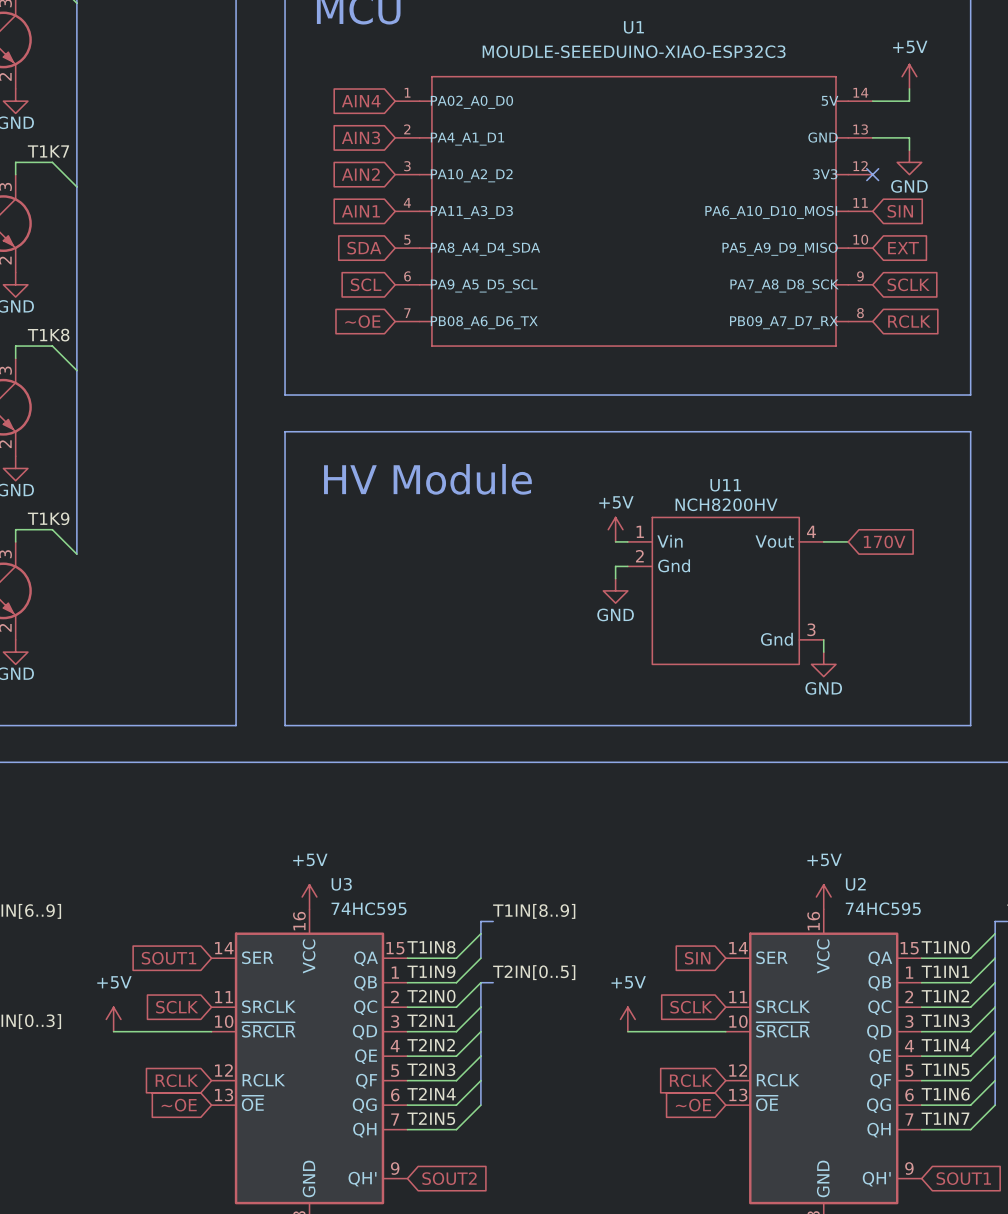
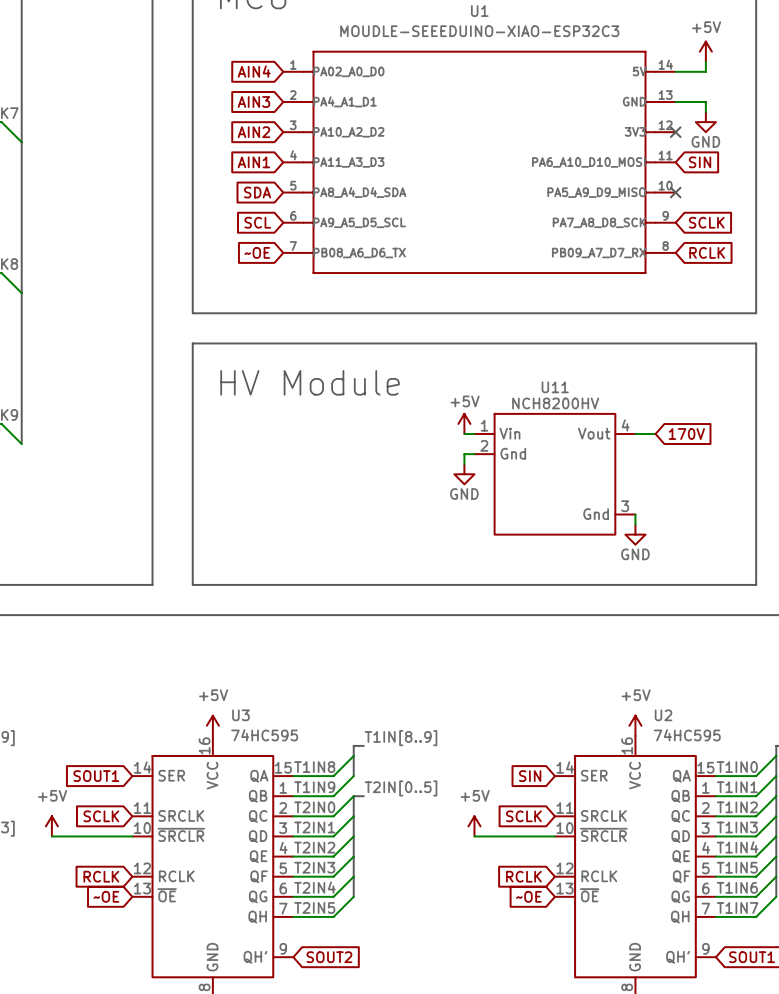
no-connect mark: none -> (675, 192)
global label: EXT (903, 248) -> none

